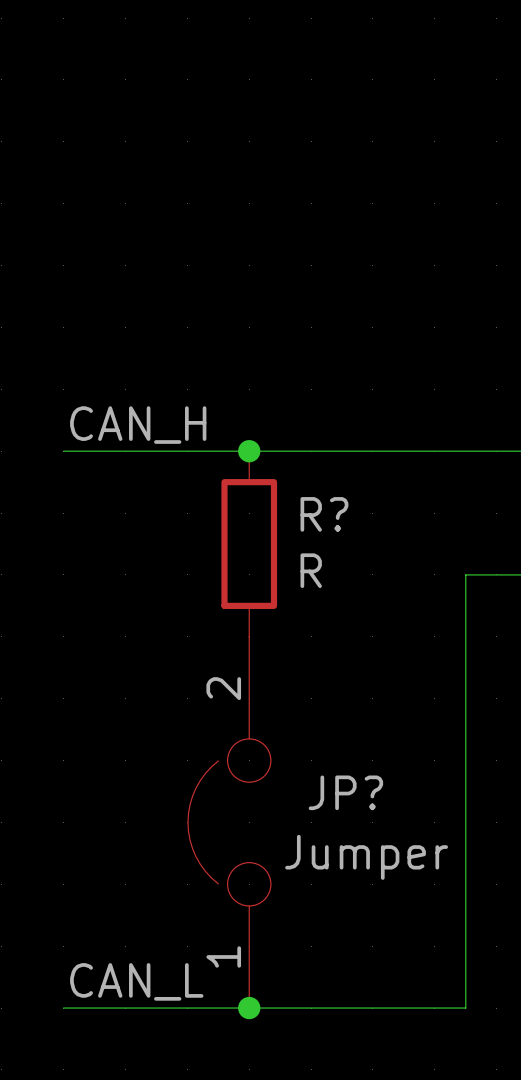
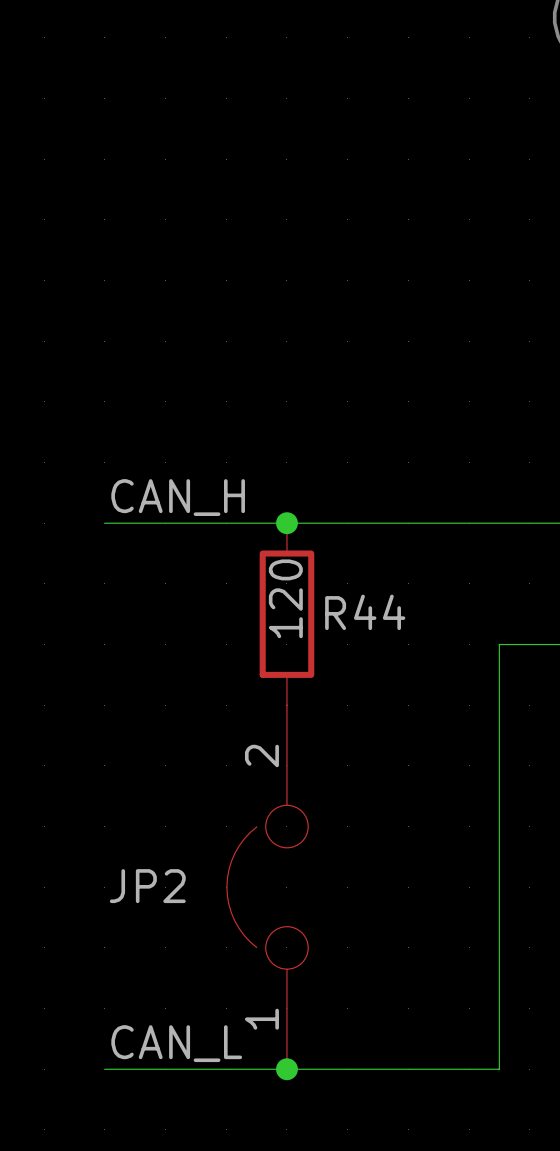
R? name: R? (324, 514) -> R44 (365, 612)
R? value: R (311, 570) -> 120 (285, 598)
JP? name: JP? (345, 792) -> JP2 (147, 886)
JP? value: Jumper (366, 857) -> none

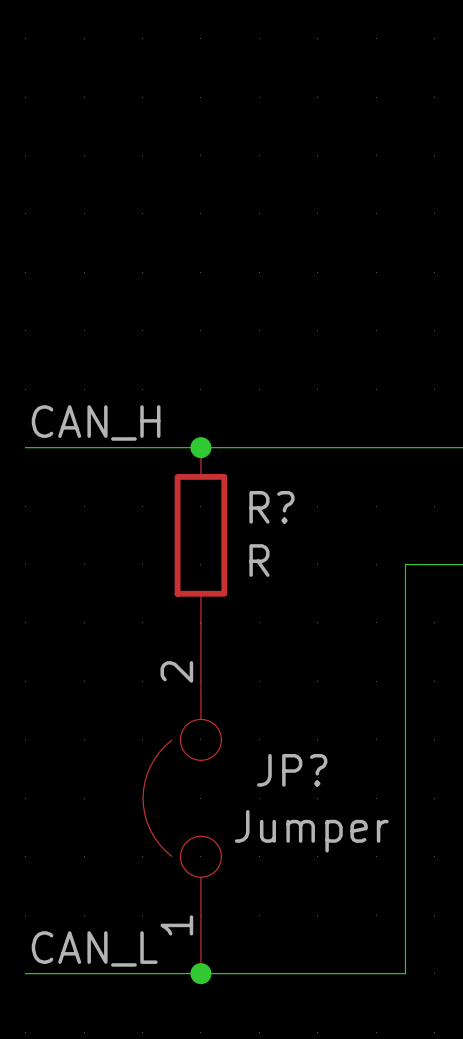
R44 value: 120 (285, 598) -> R (259, 560)
R44 name: R44 (365, 612) -> R? (271, 507)
JP2 name: JP2 (147, 886) -> JP? (292, 770)
JP2 value: none -> Jumper (311, 831)

